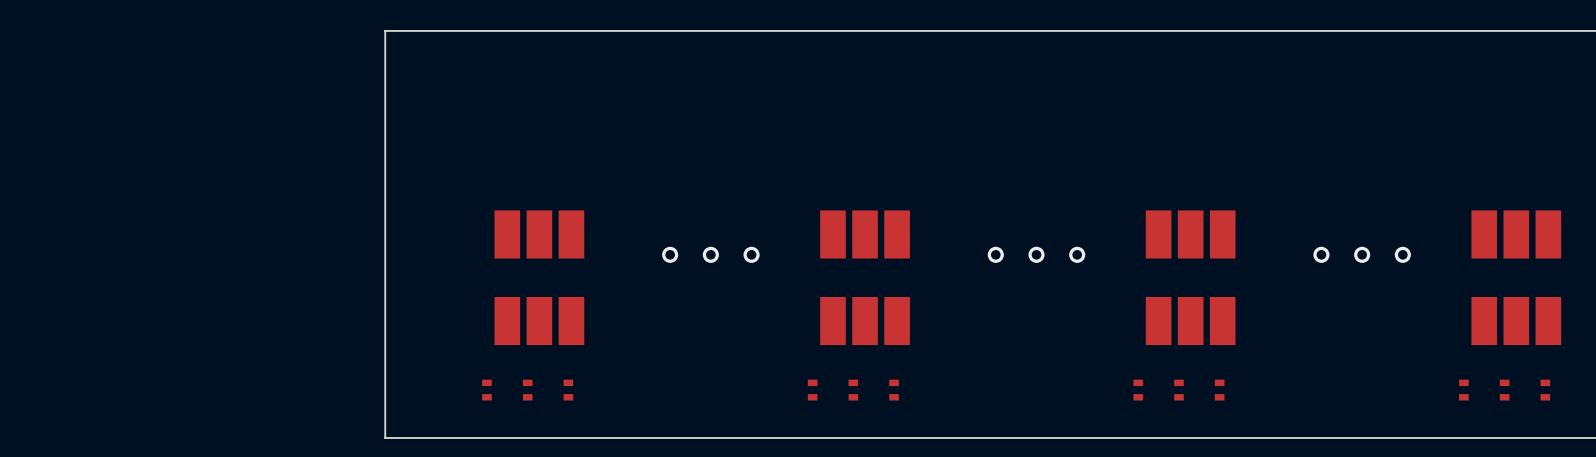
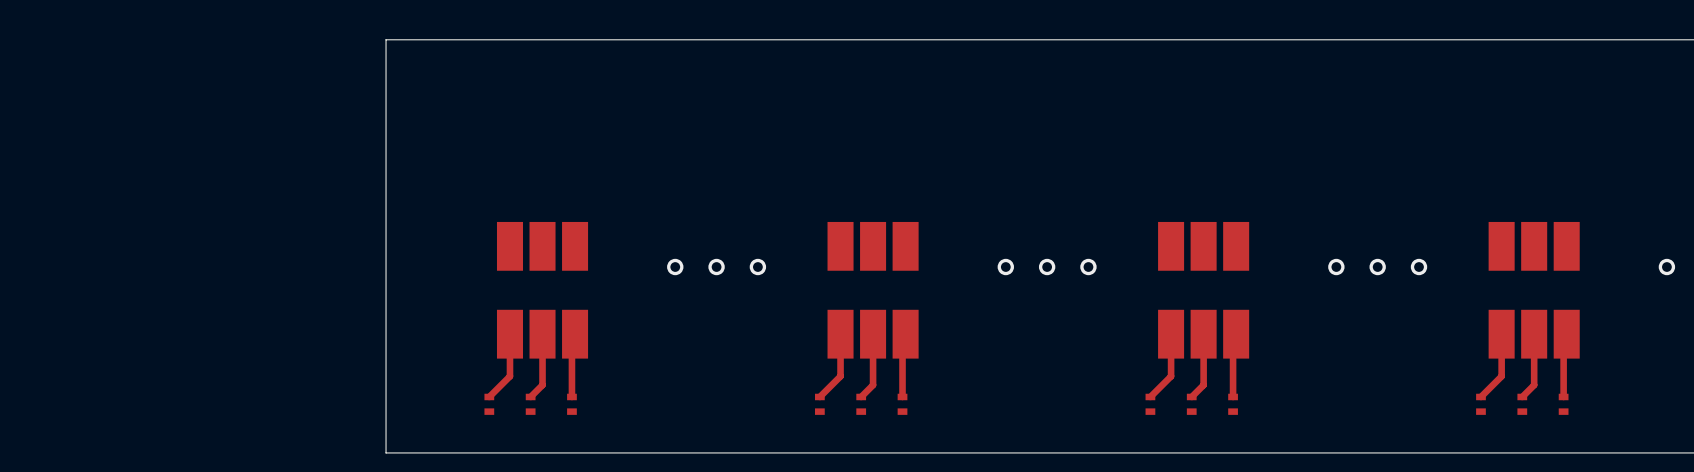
top track: none -> (509, 334) (509, 376) (489, 396)
top track: none -> (542, 334) (542, 385) (530, 396)
top track: none -> (575, 334) (571, 337) (571, 396)
top track: none -> (840, 334) (840, 376) (819, 396)
top track: none -> (873, 334) (873, 385) (861, 396)
top track: none -> (905, 334) (902, 337) (902, 396)
top track: none -> (1171, 334) (1171, 376) (1150, 396)
top track: none -> (1203, 334) (1203, 385) (1191, 396)
top track: none -> (1236, 334) (1233, 337) (1233, 396)
top track: none -> (1501, 334) (1501, 376) (1480, 396)
top track: none -> (1534, 334) (1534, 385) (1522, 396)
top track: none -> (1566, 334) (1563, 337) (1563, 396)

